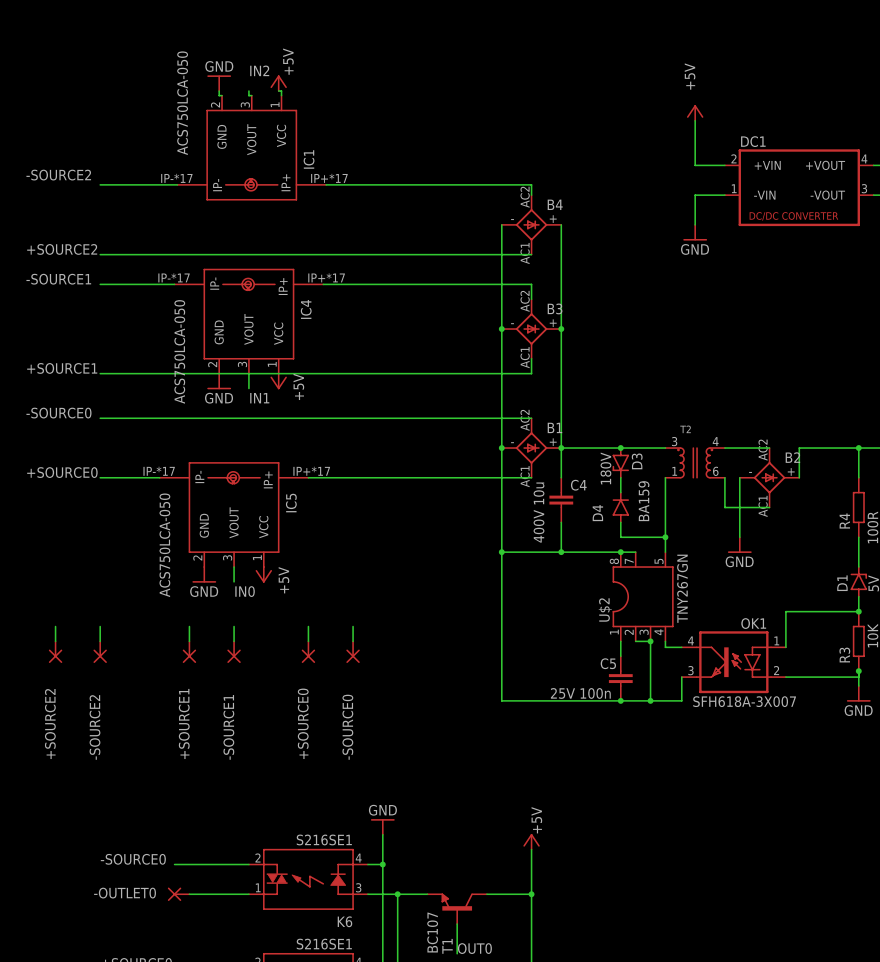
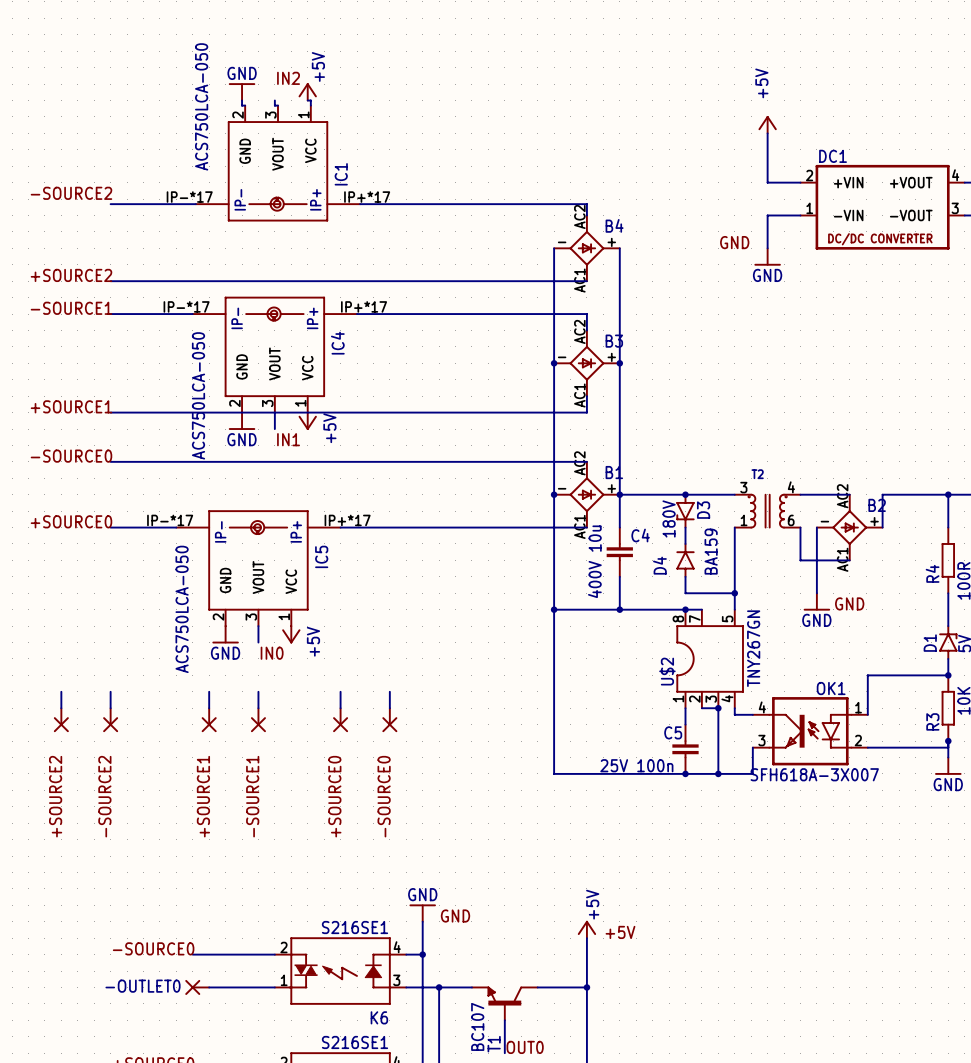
label: none -> GND (734, 242)
label: none -> GND (849, 603)
label: none -> GND (455, 916)
label: none -> +5V (620, 932)

